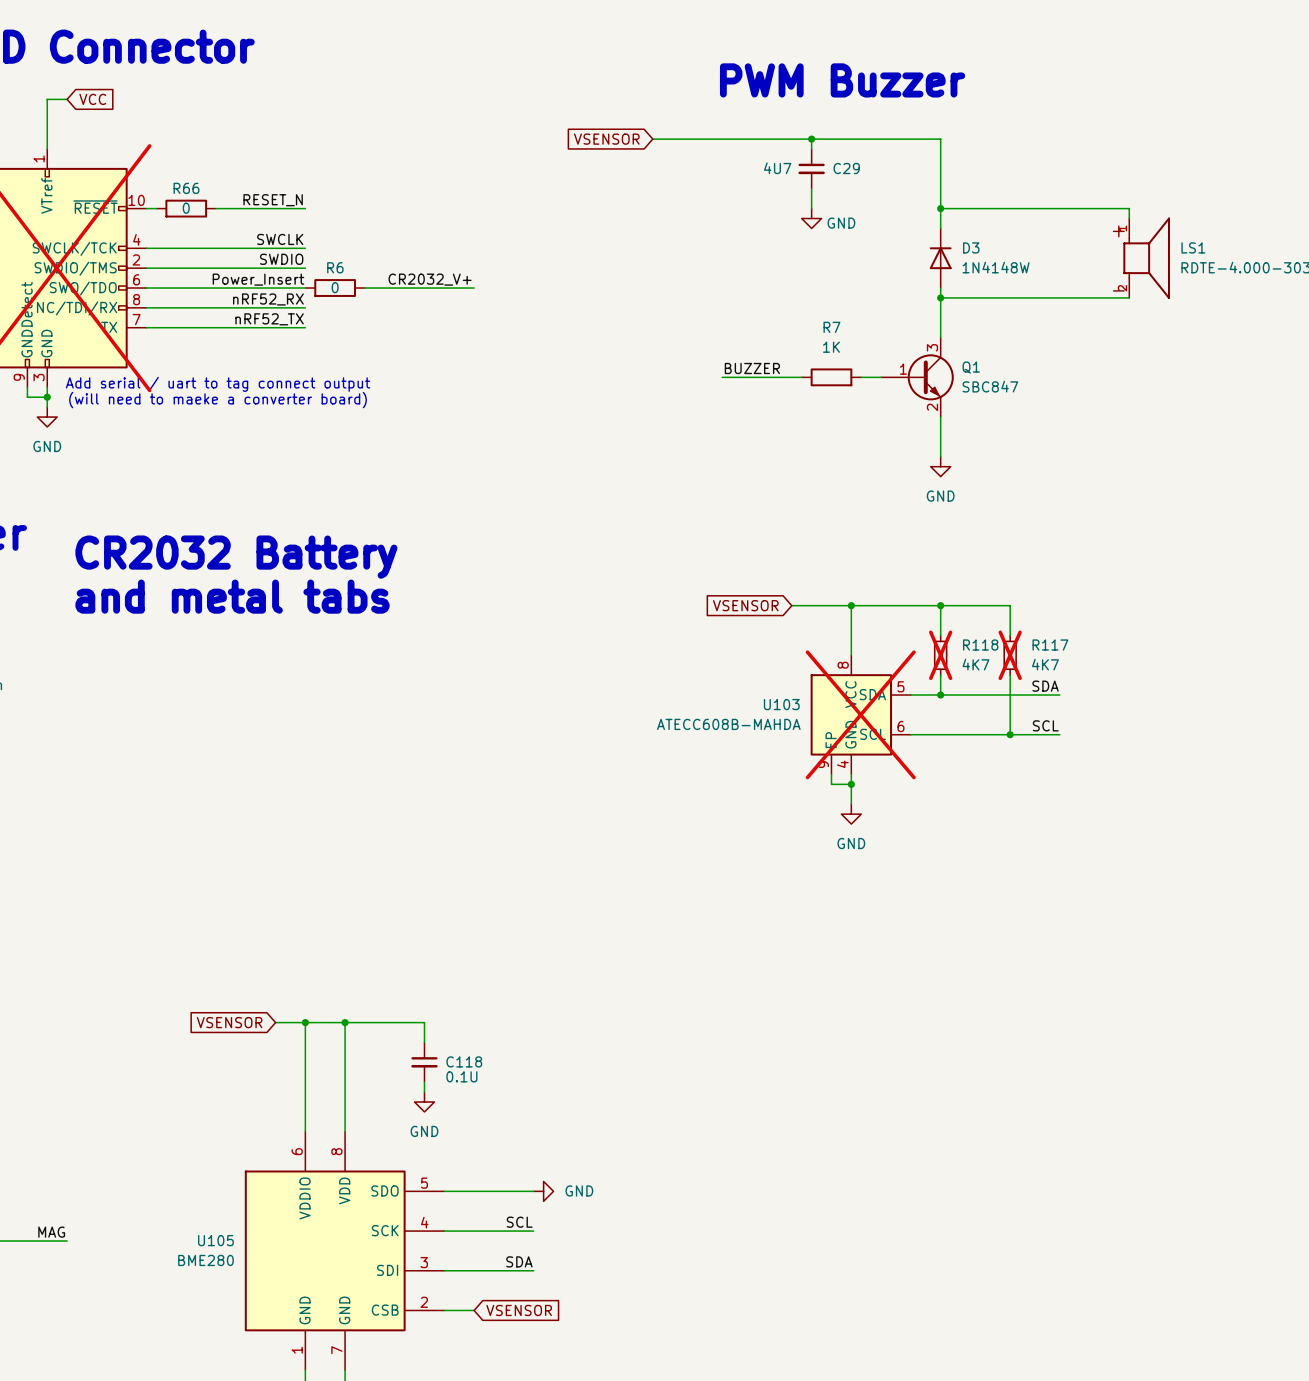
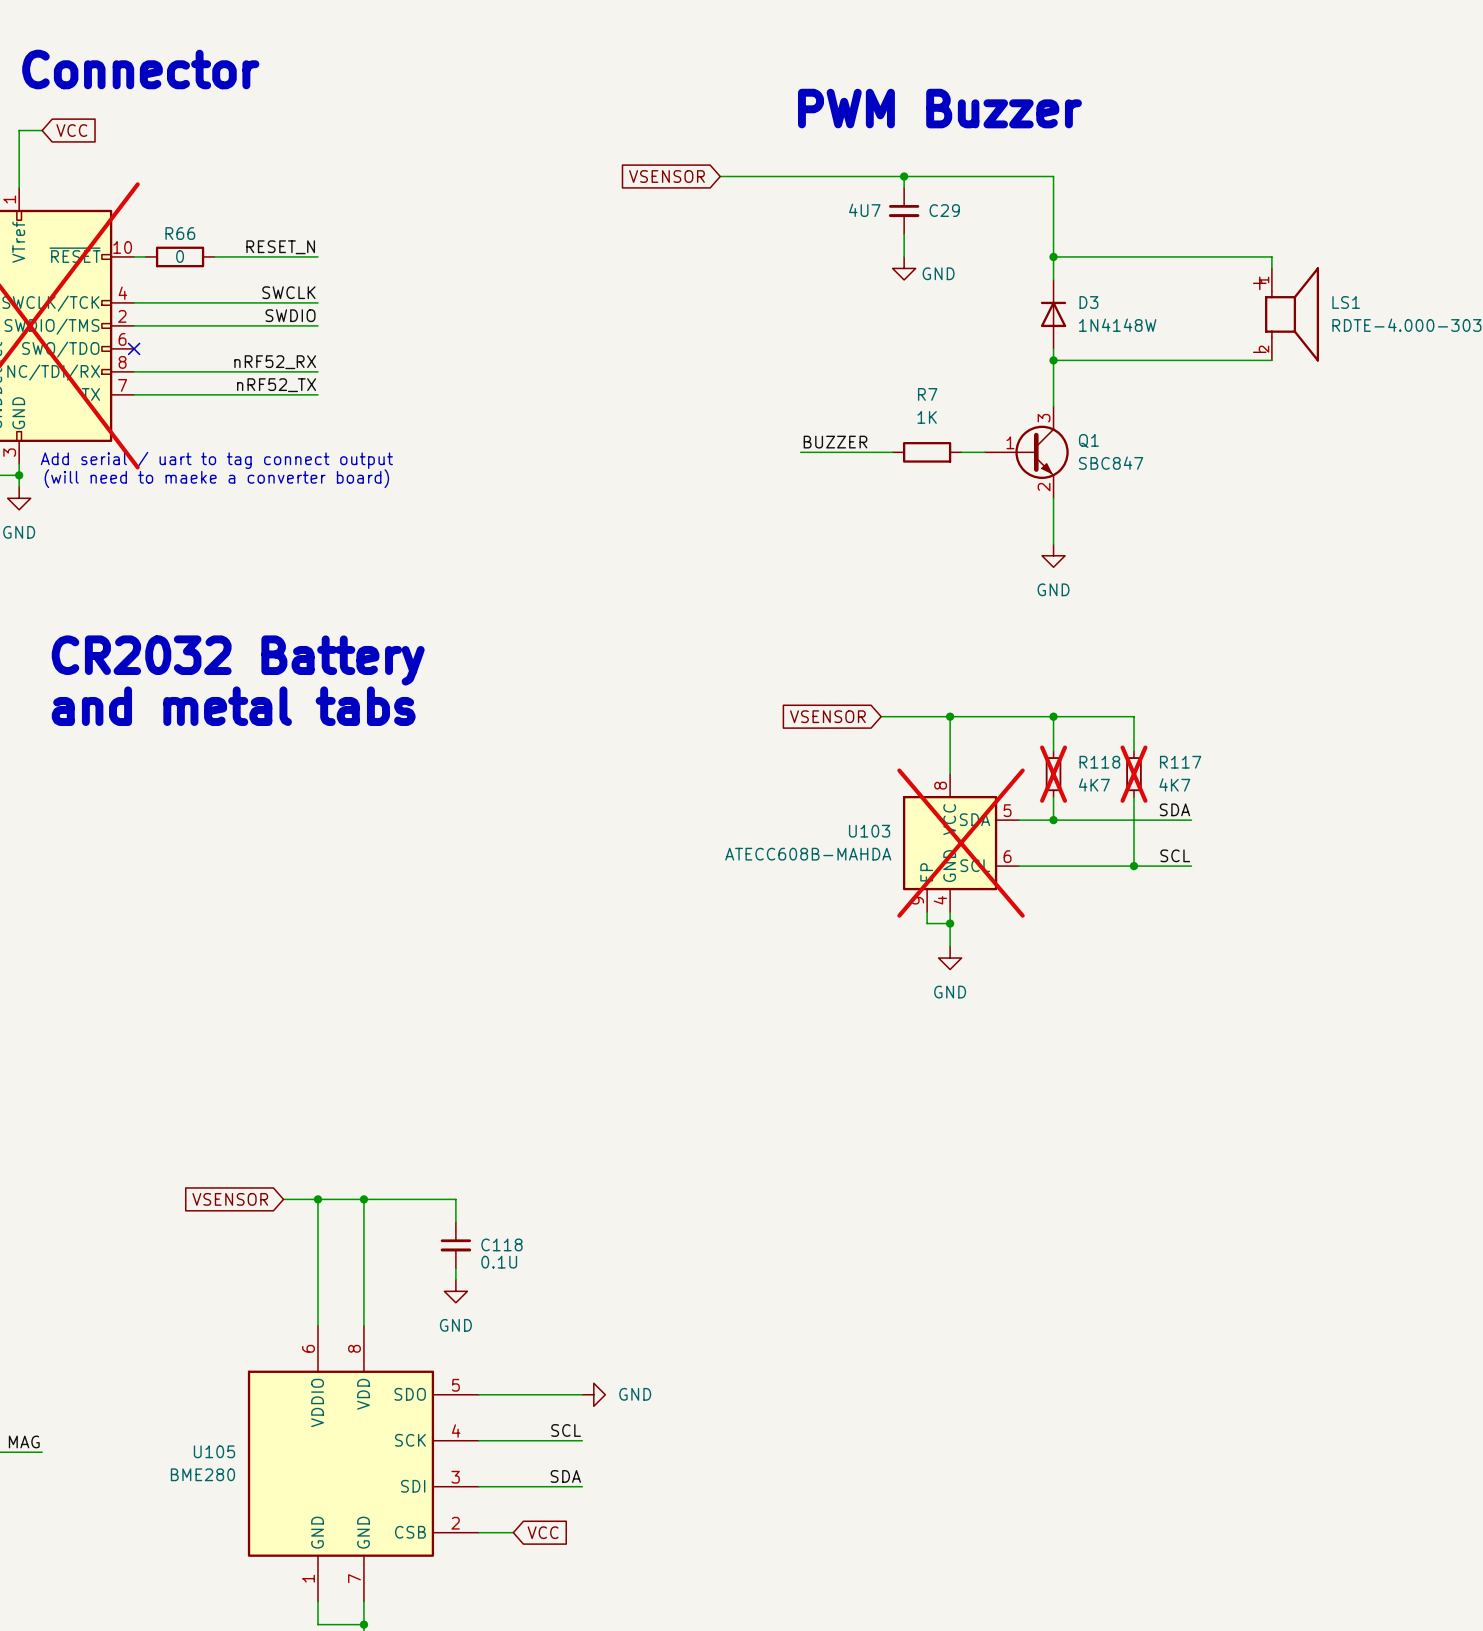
label: Power_Insert (258, 279) -> none
label: CR2032_V+ (430, 279) -> none
wire: (146, 288) (305, 288) -> none
no-connect mark: none -> (134, 348)
R6: 0 (335, 288) -> none
wire: (364, 288) (474, 288) -> none
global label: VSENSOR (519, 1310) -> VCC (543, 1532)

